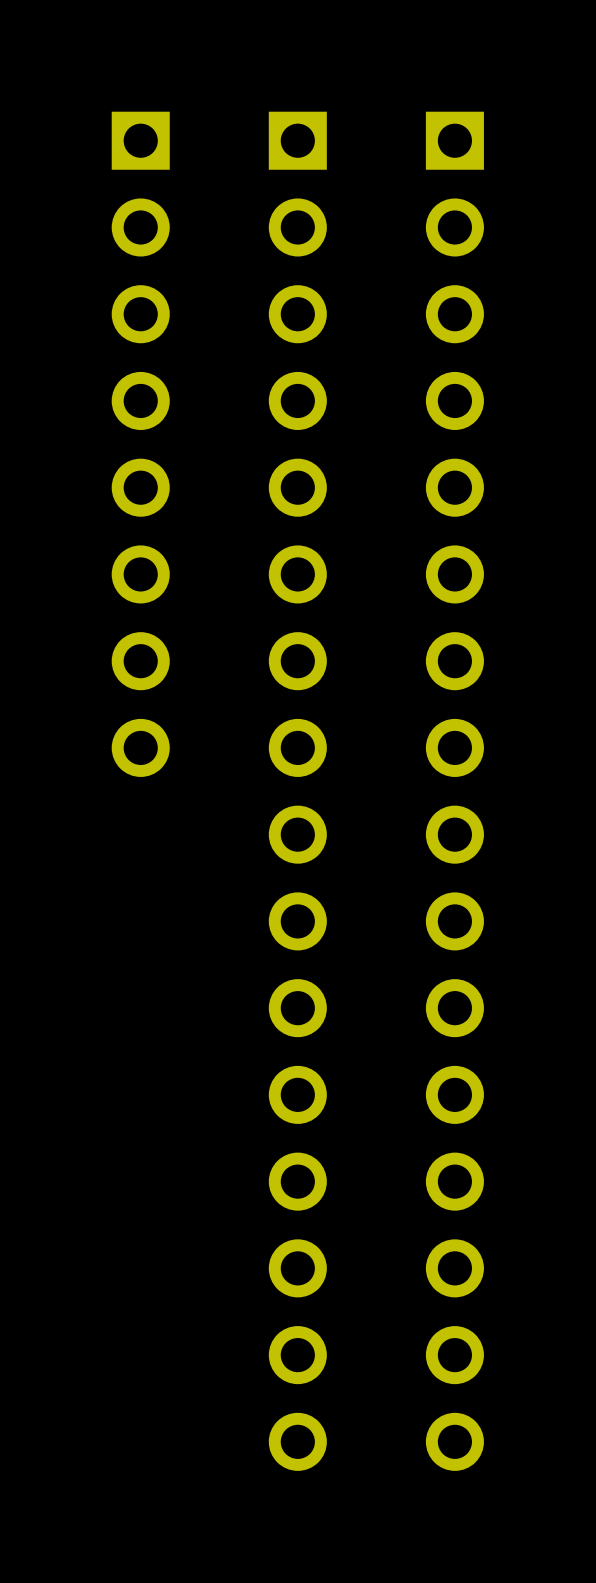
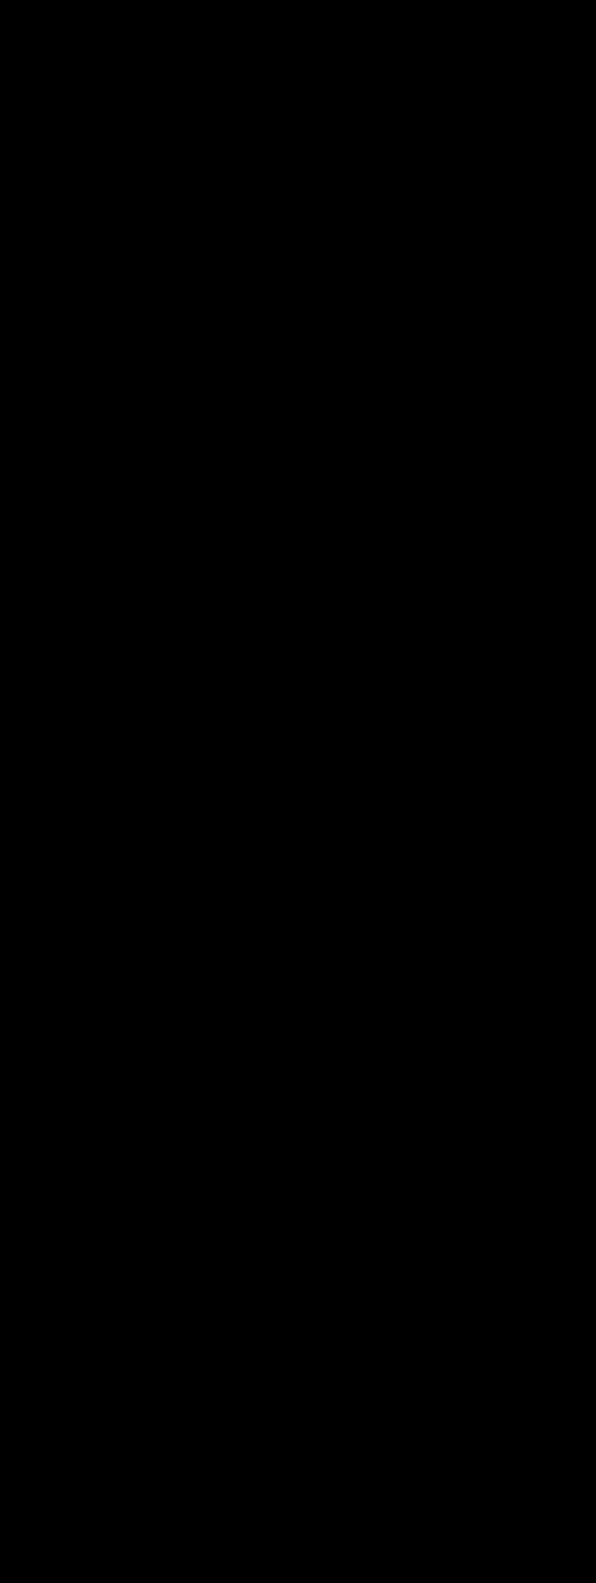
part: (140, 444) -> none
part: (297, 791) -> none
part: (454, 791) -> none

